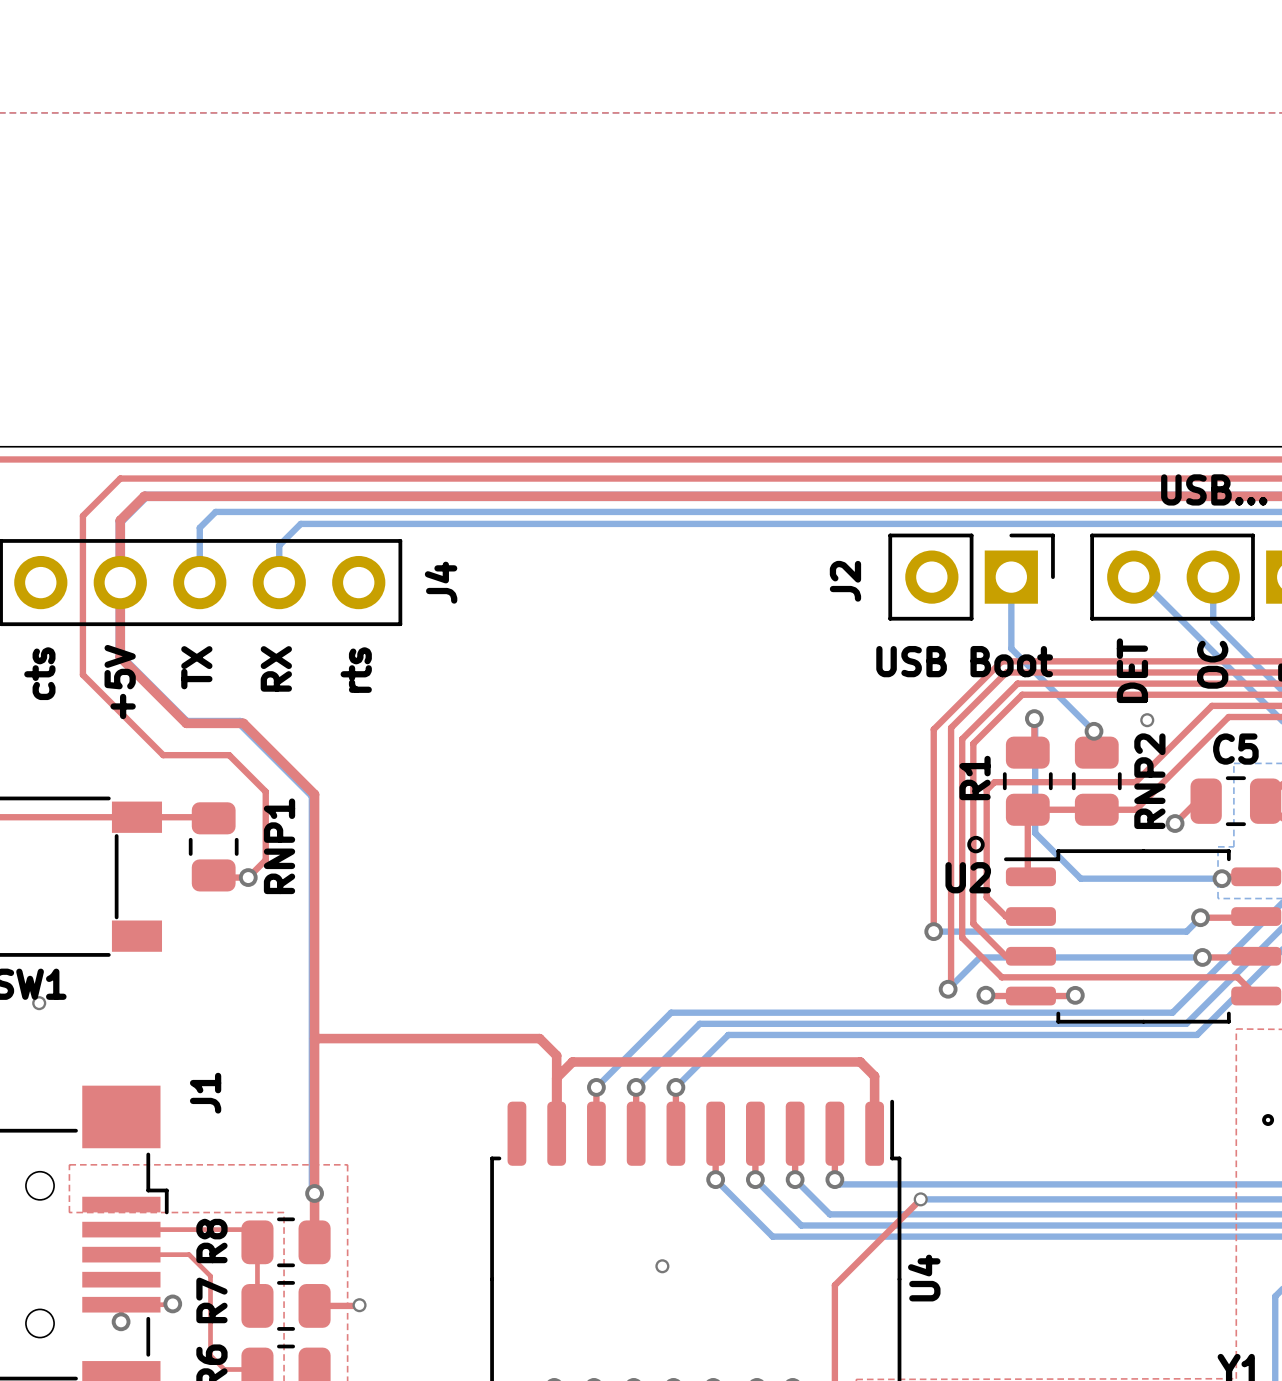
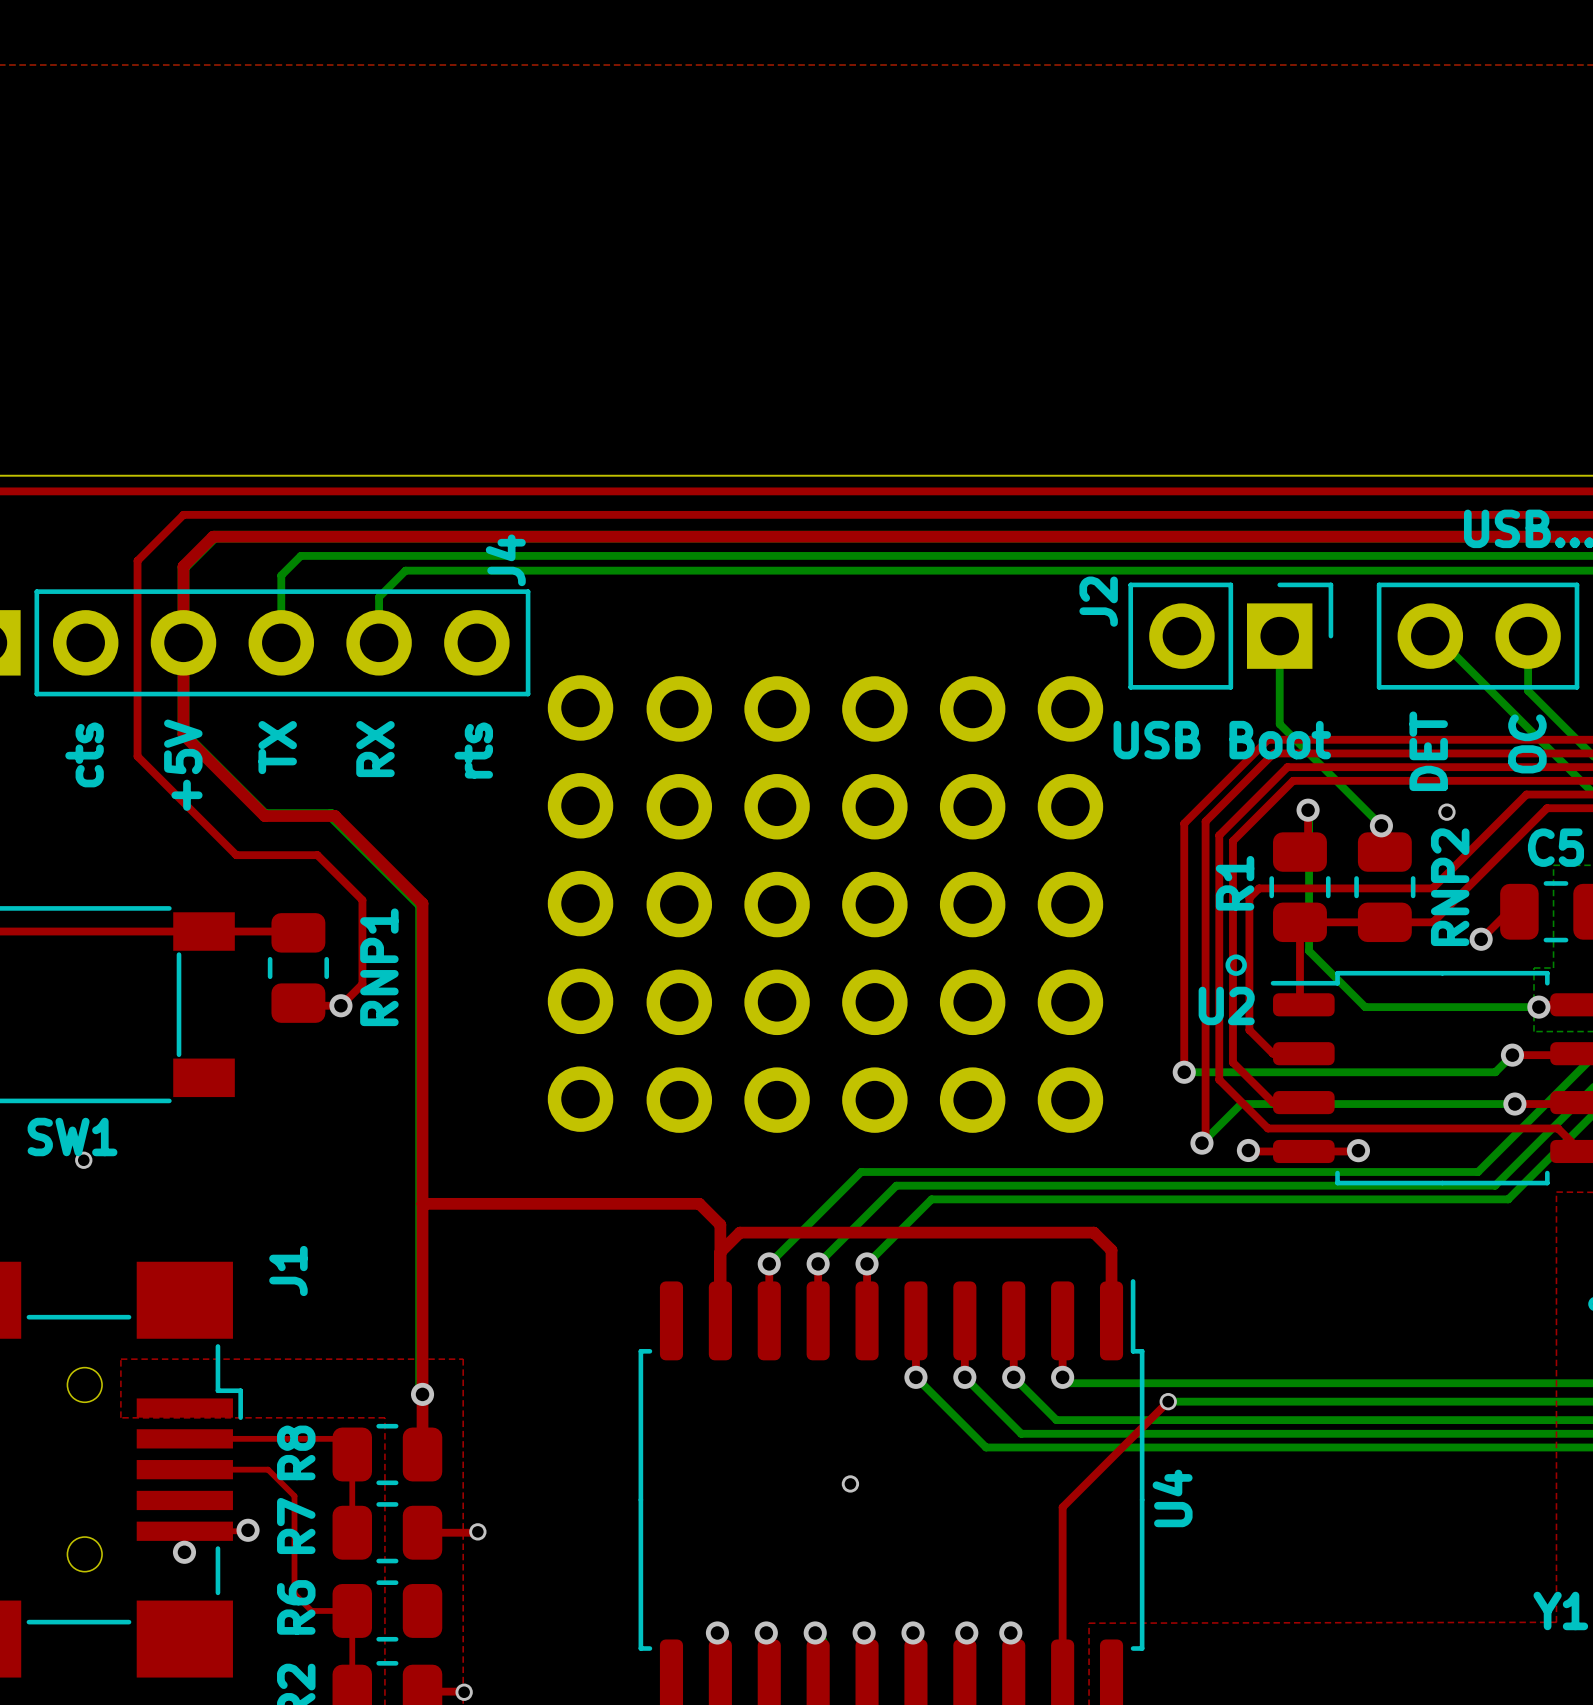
J2 name position: J2 (845, 581) -> J2 (1098, 601)
J4 name position: J4 (441, 582) -> J4 (505, 560)
part: none -> (580, 903)
part: none -> (679, 904)
part: none -> (777, 904)
part: none -> (874, 904)
part: none -> (972, 904)
part: none -> (1070, 904)

